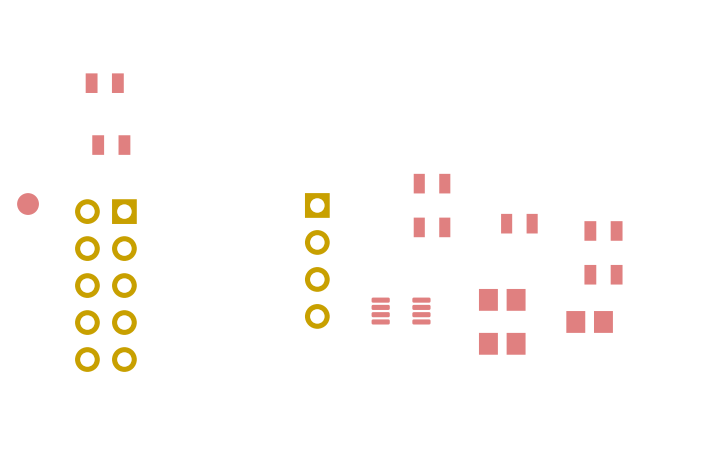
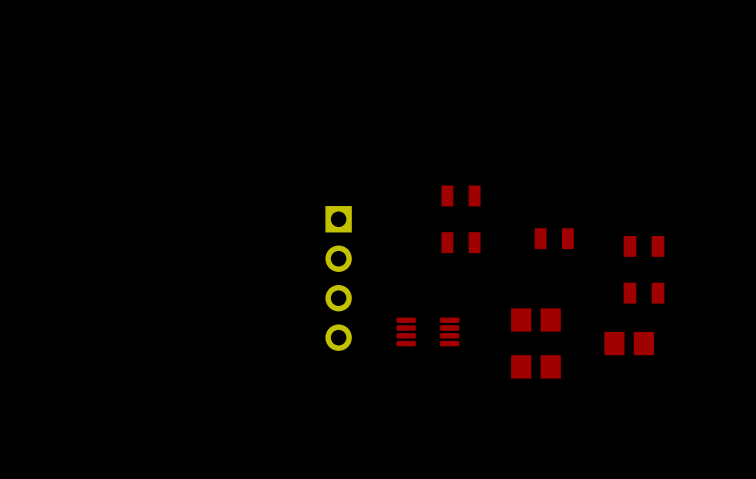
part: (104, 83) -> none
part: (111, 145) -> none
part: (28, 204) -> none
part: (105, 285) -> none

